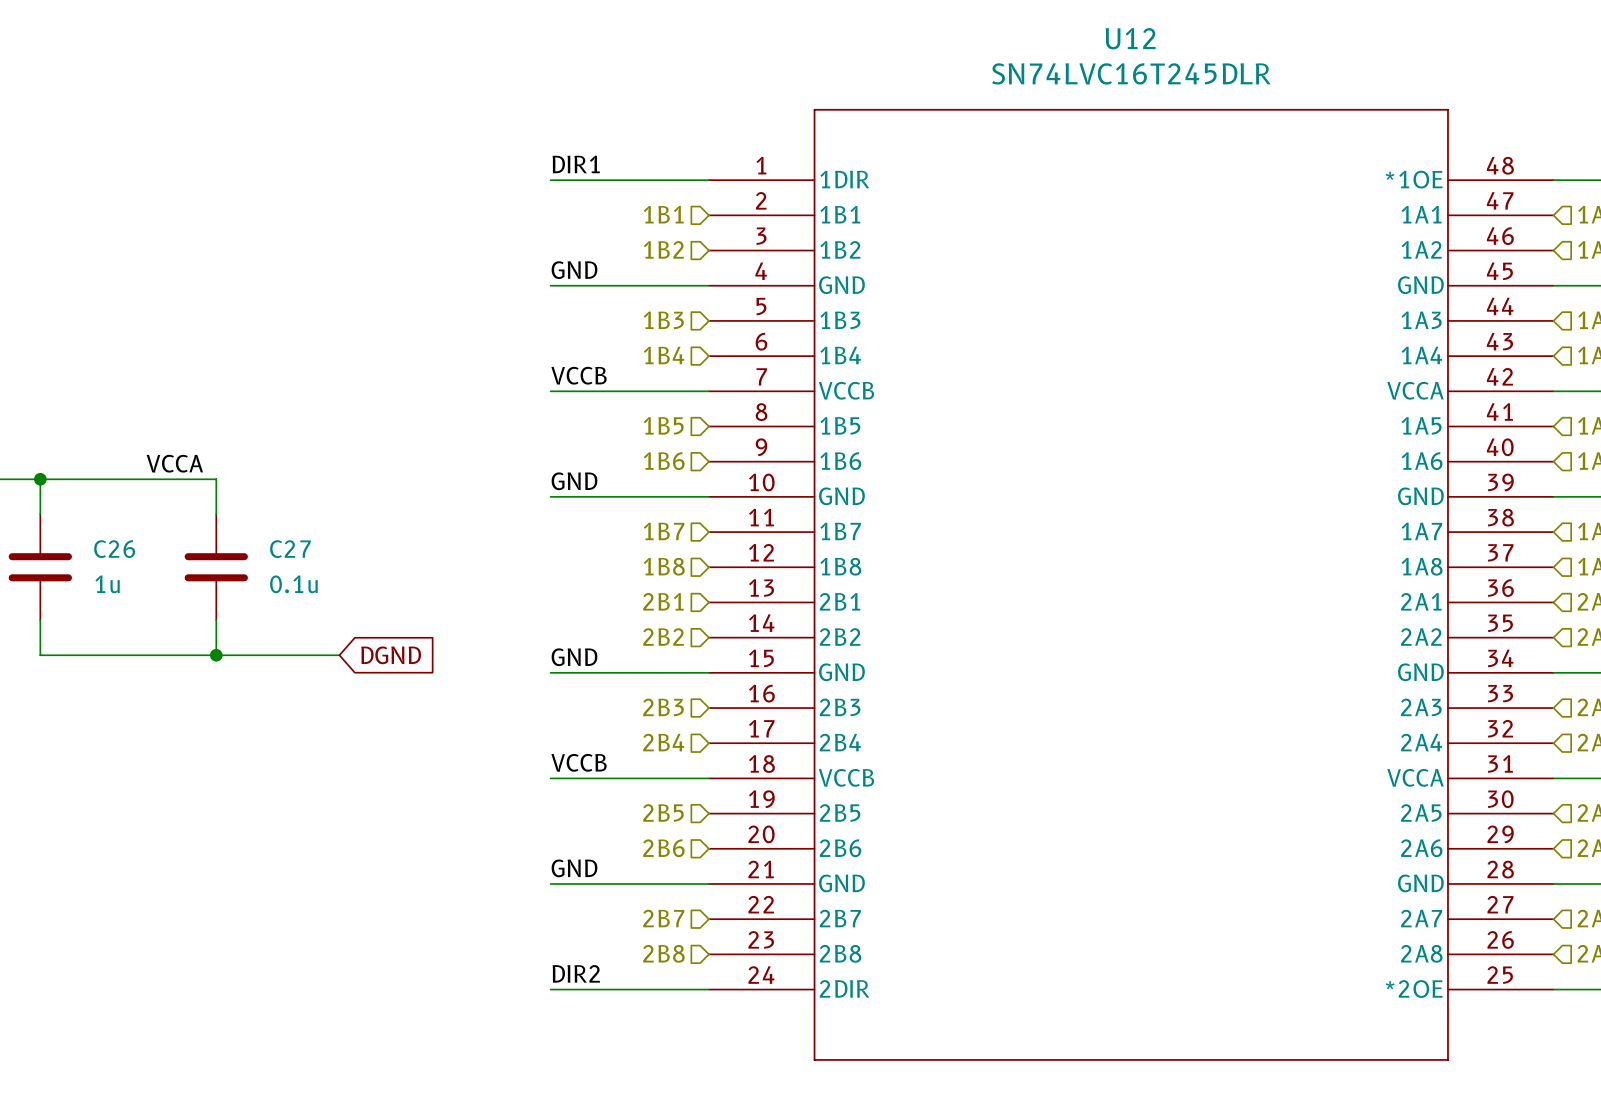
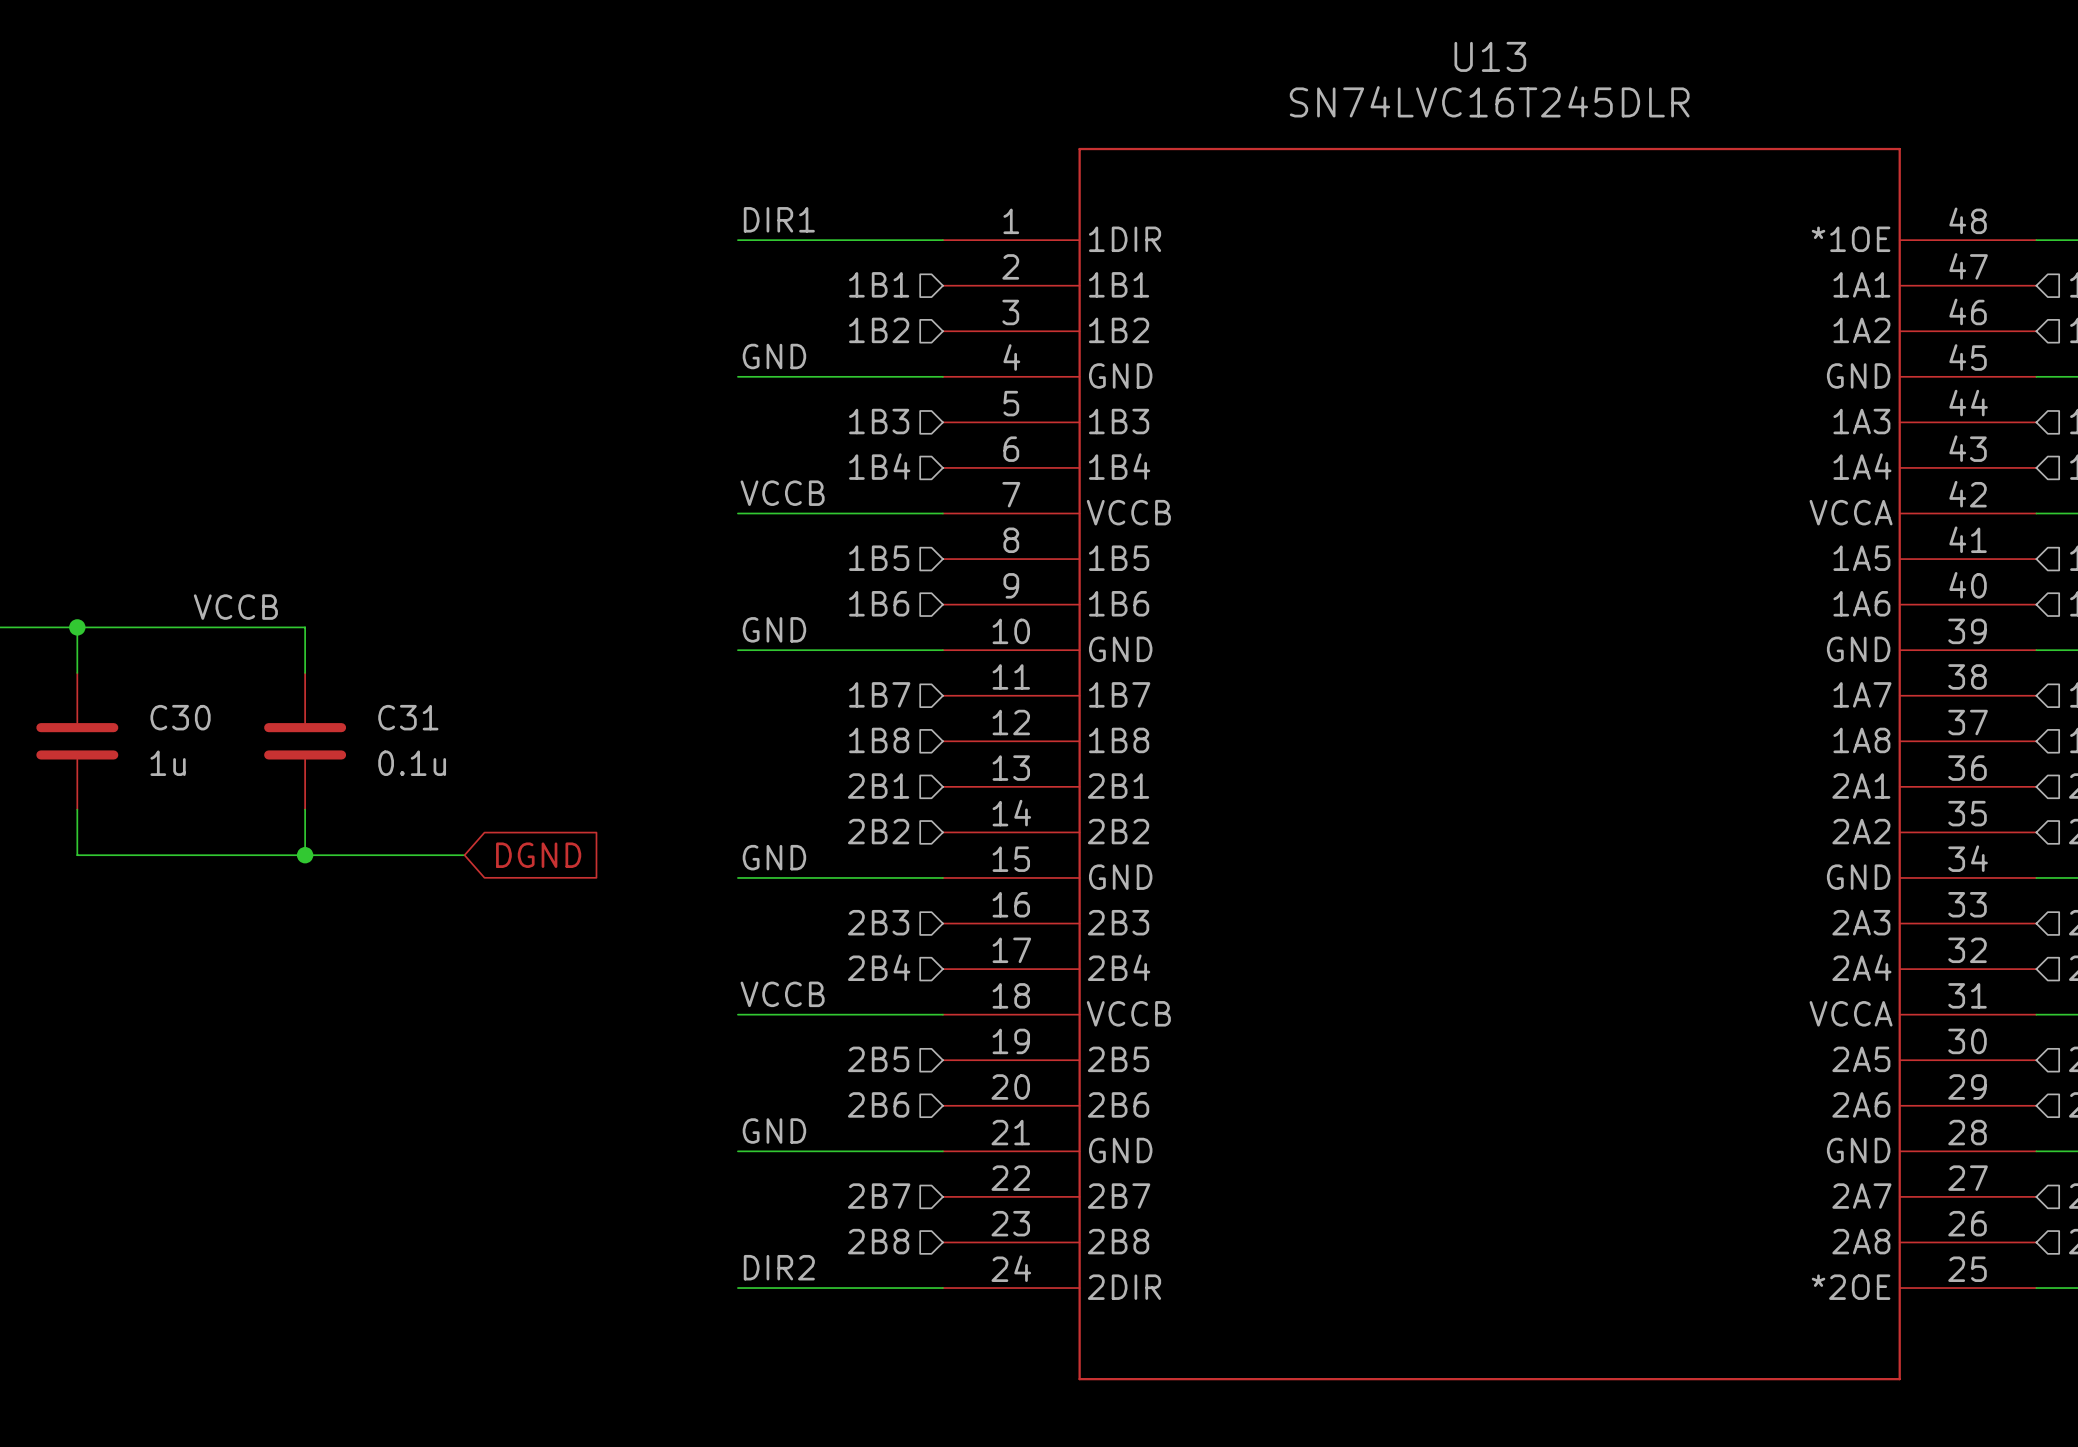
U12 name: U12 (1130, 38) -> U13 (1490, 56)
label: VCCA (174, 463) -> VCCB (235, 607)
C26 name: C26 (114, 549) -> C30 (180, 717)
C27 name: C27 (290, 549) -> C31 (408, 717)

